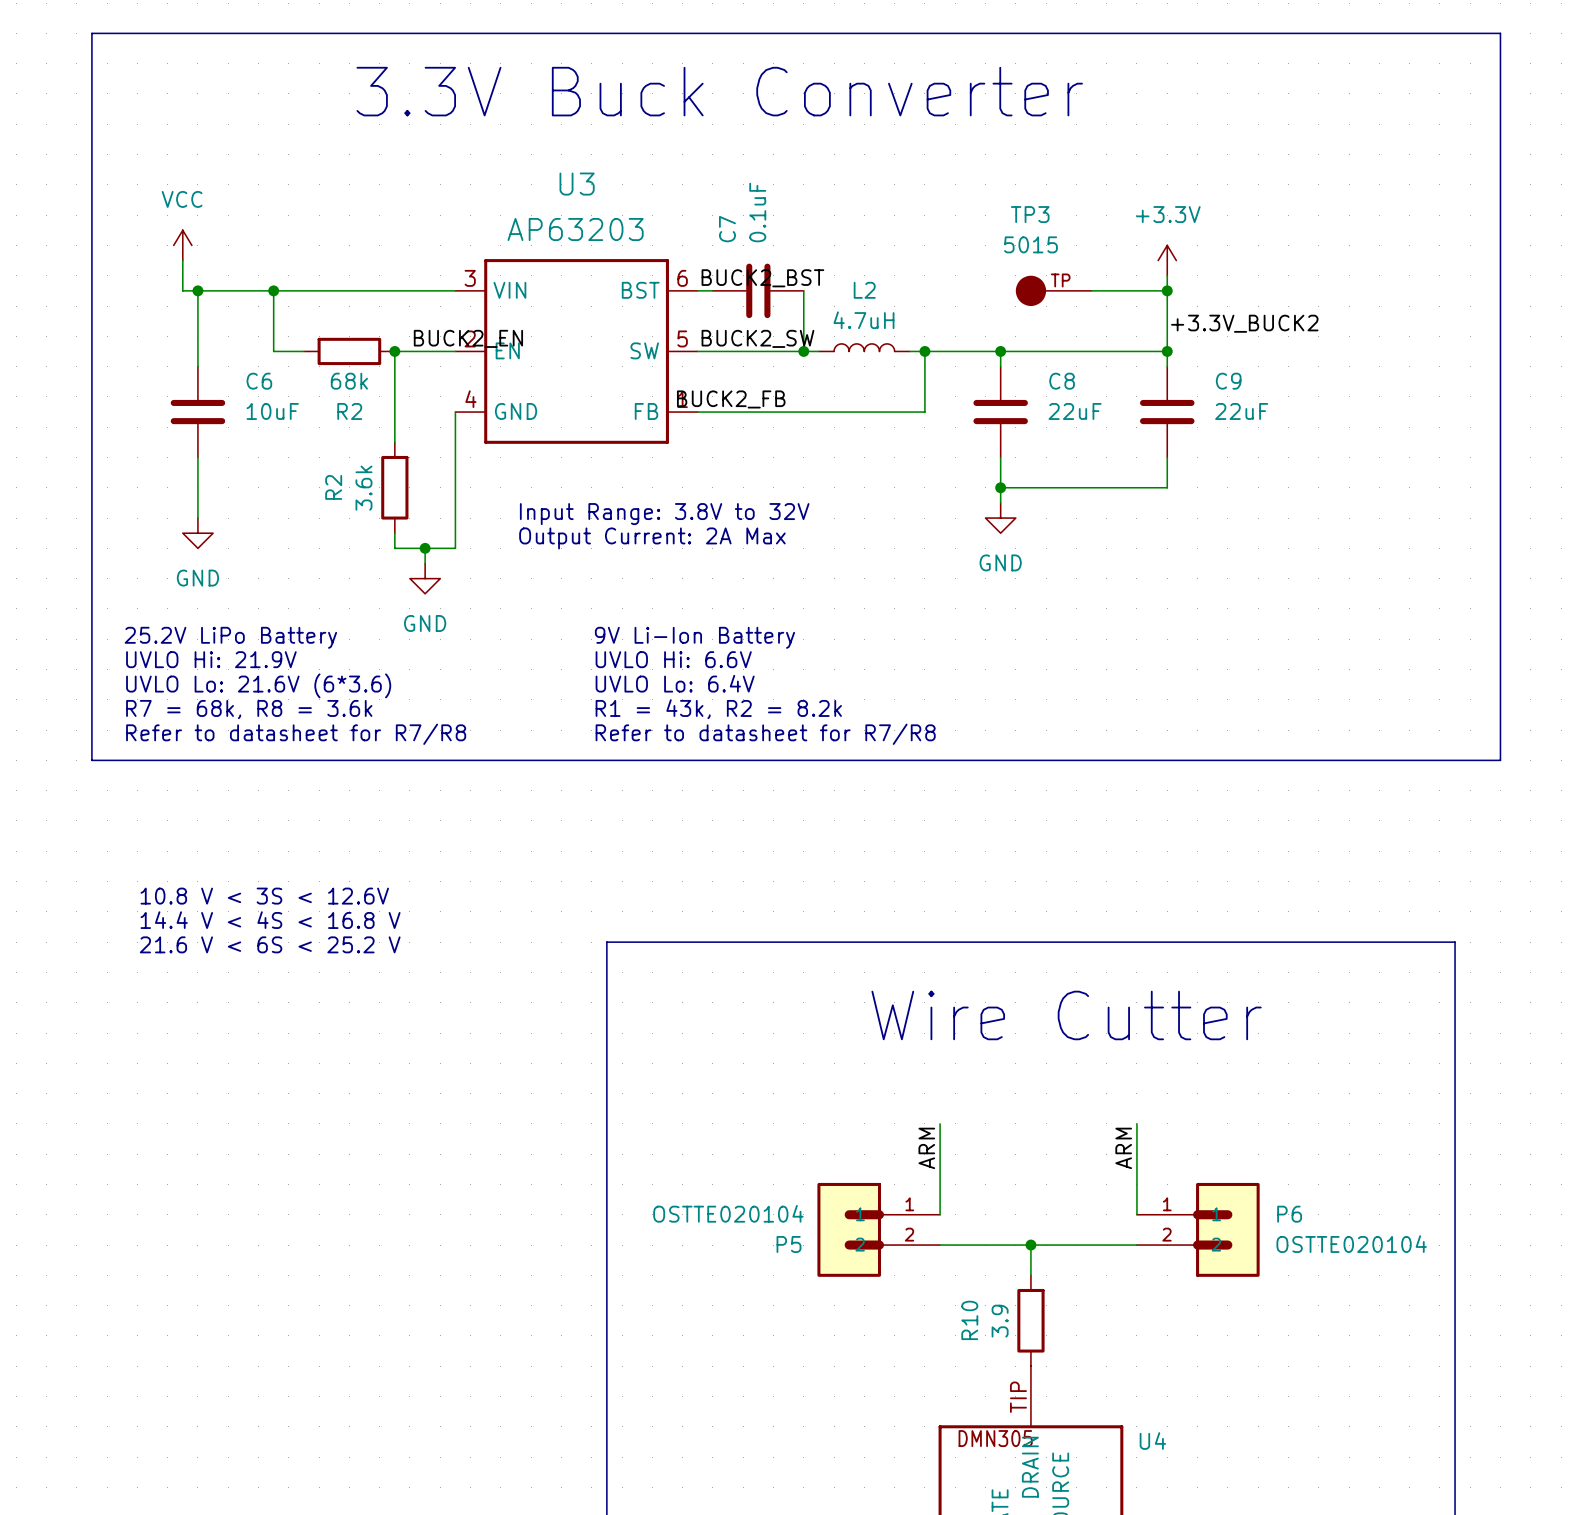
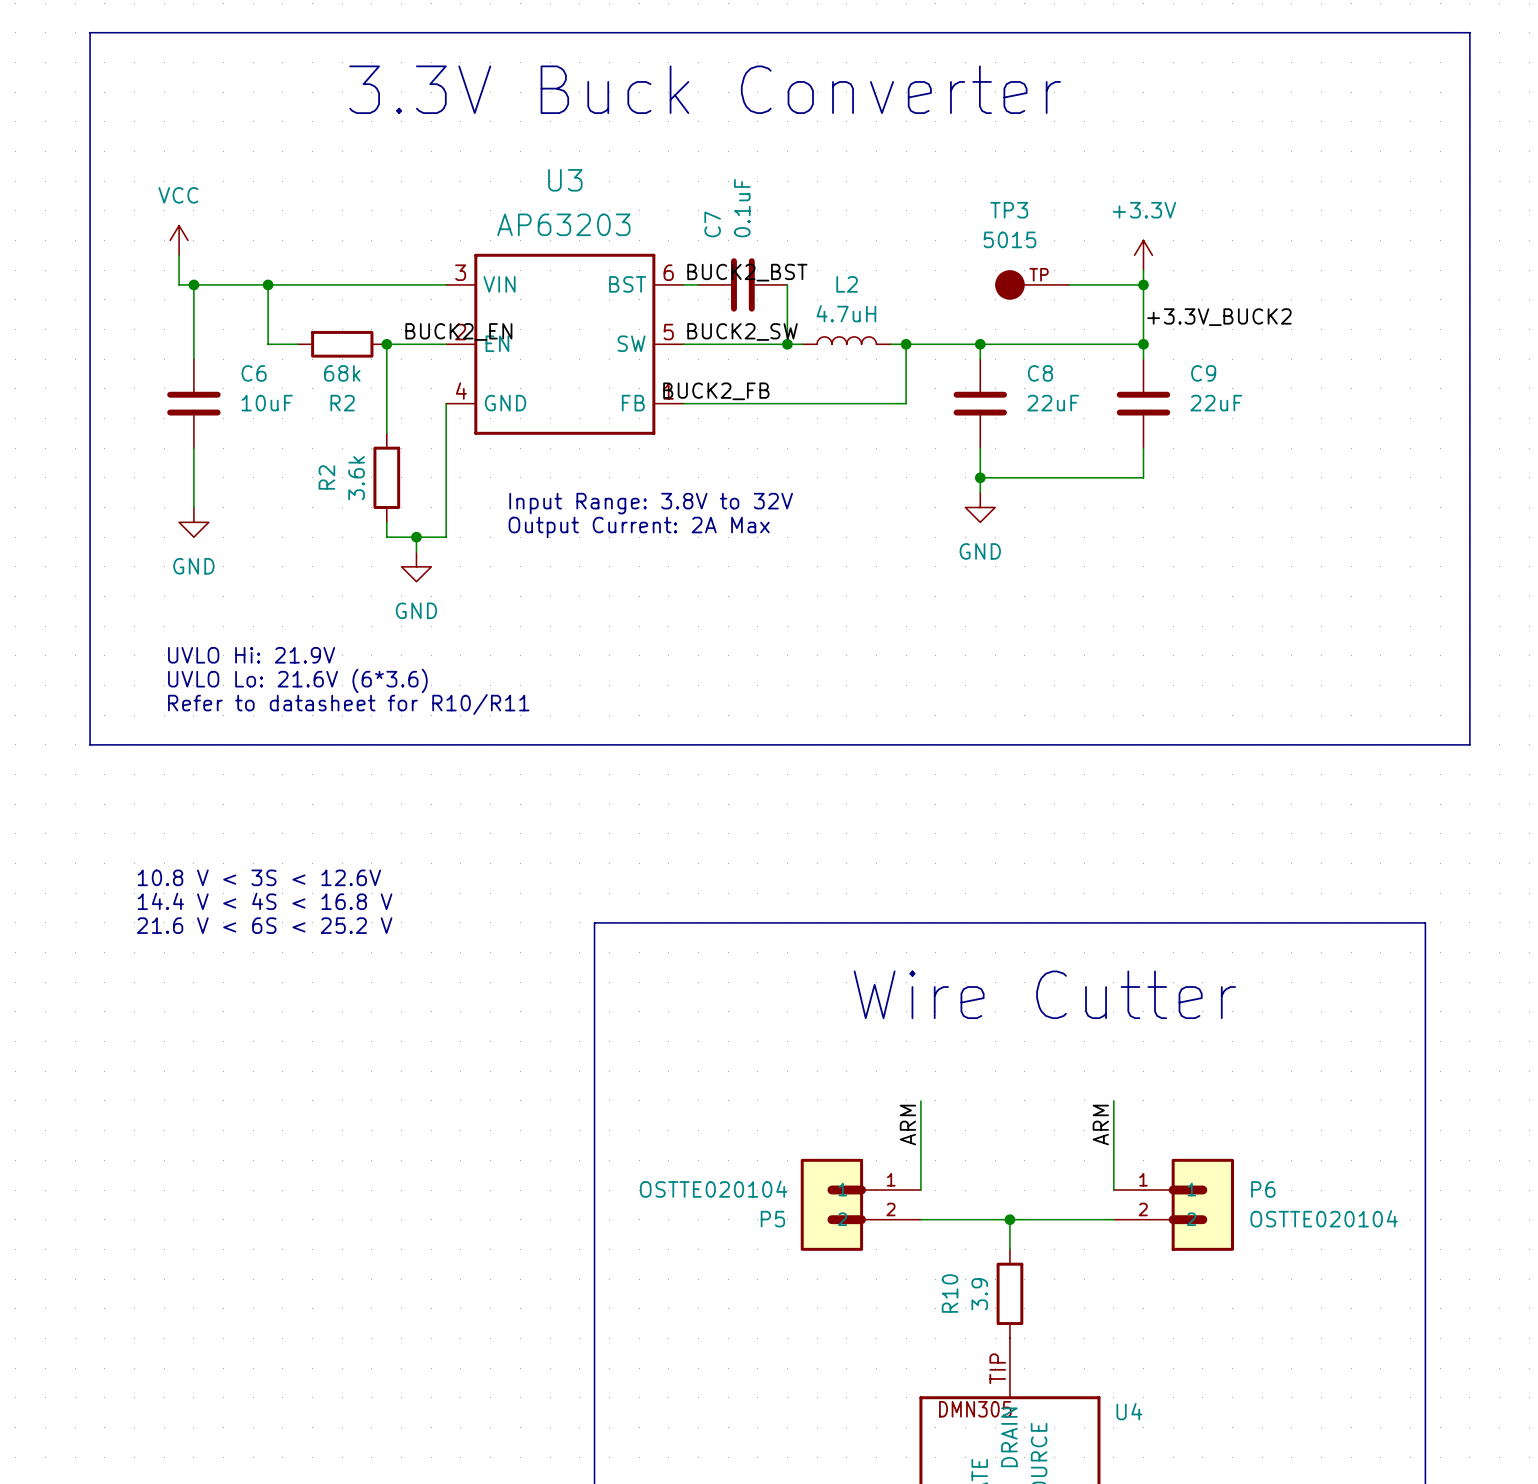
text: 25.2V LiPo Battery (230, 637) -> none
text: 9V Li-Ion Battery (694, 637) -> none
text position: UVLO Hi: 21.9V (211, 659) -> UVLO Hi: 21.9V (251, 655)
text: UVLO Hi: 6.6V (673, 659) -> none
text: UVLO Lo: 6.4V (675, 683) -> none
text position: UVLO Lo: 21.6V (6*3.6) (258, 685) -> UVLO Lo: 21.6V (6*3.6) (297, 680)
text: R7 = 68k, R8 = 3.6k (249, 709) -> none
text: R1 = 43k, R2 = 8.2k (718, 709) -> none
text: Refer to datasheet for R7/R8 (296, 734) -> Refer to datasheet for R10/R11 (348, 704)
text: Refer to datasheet for R7/R8 (765, 734) -> none

